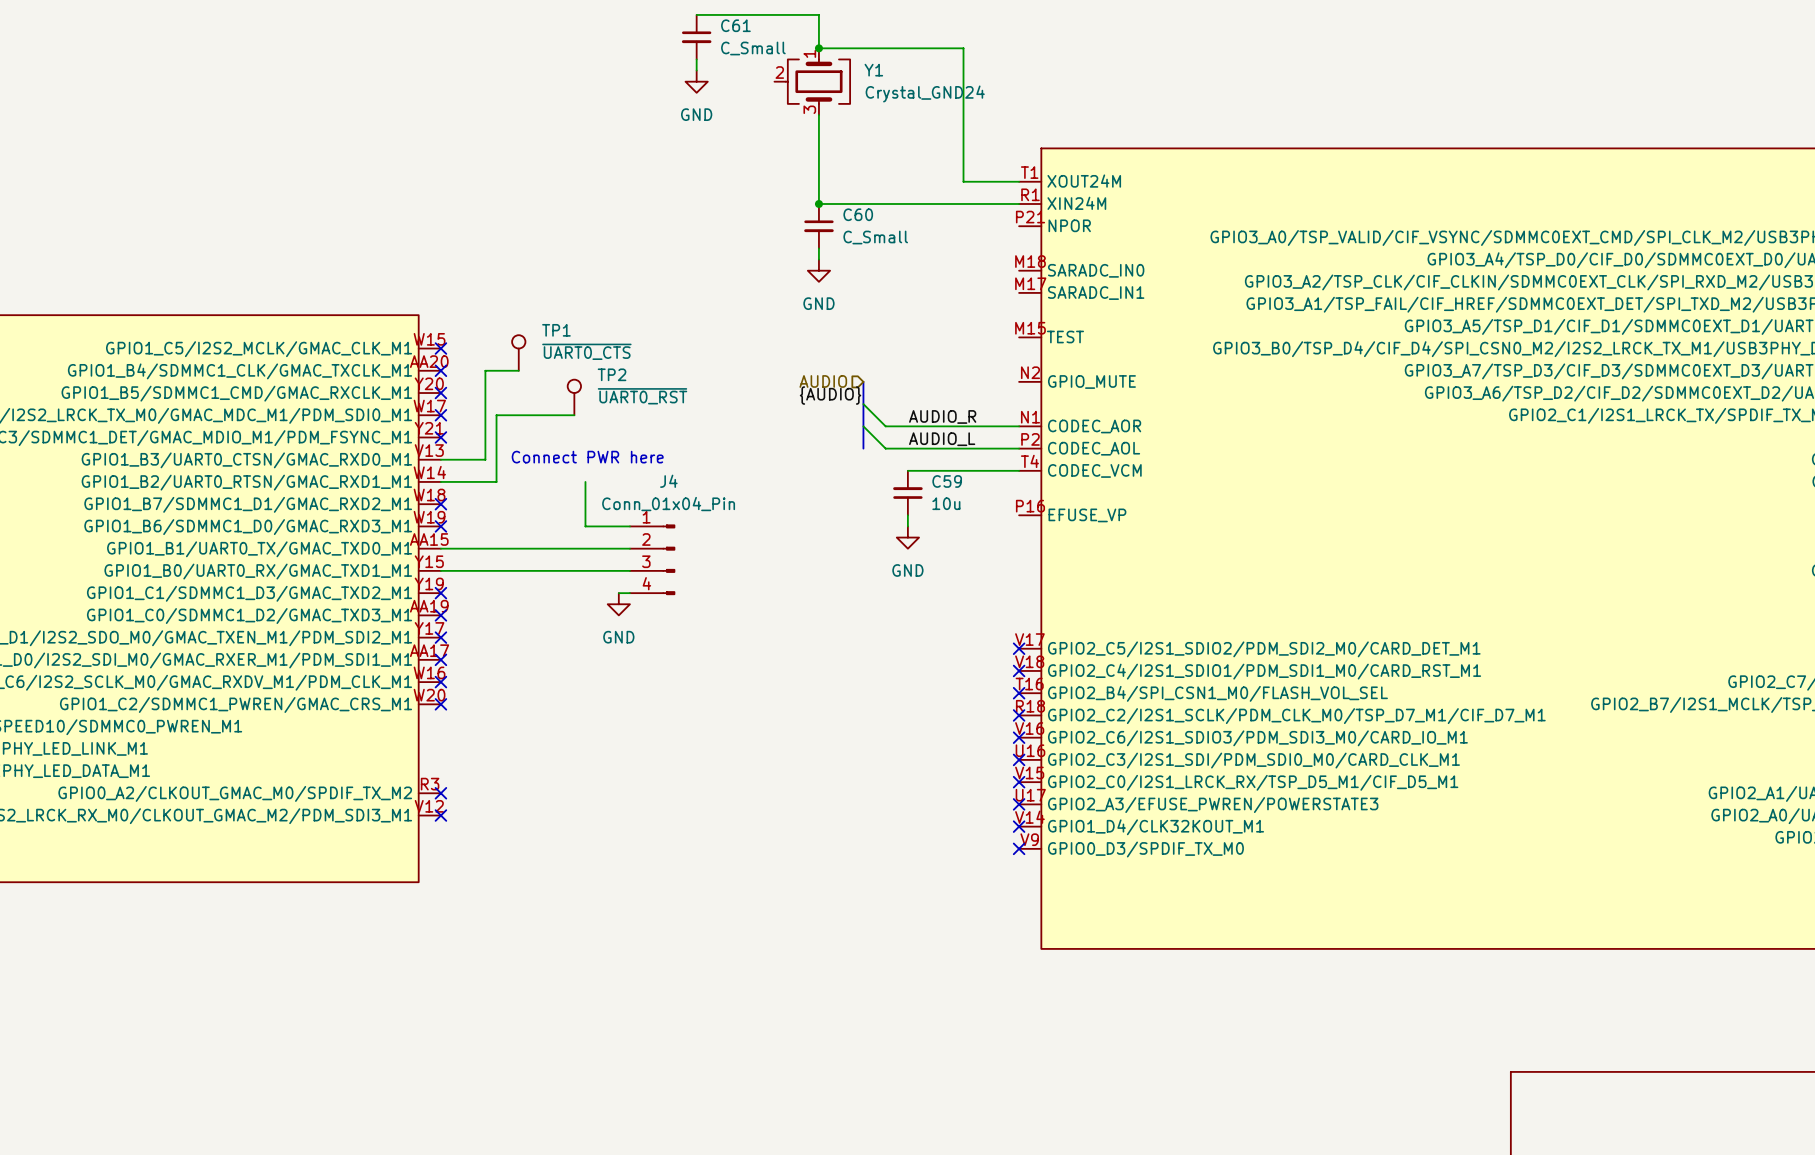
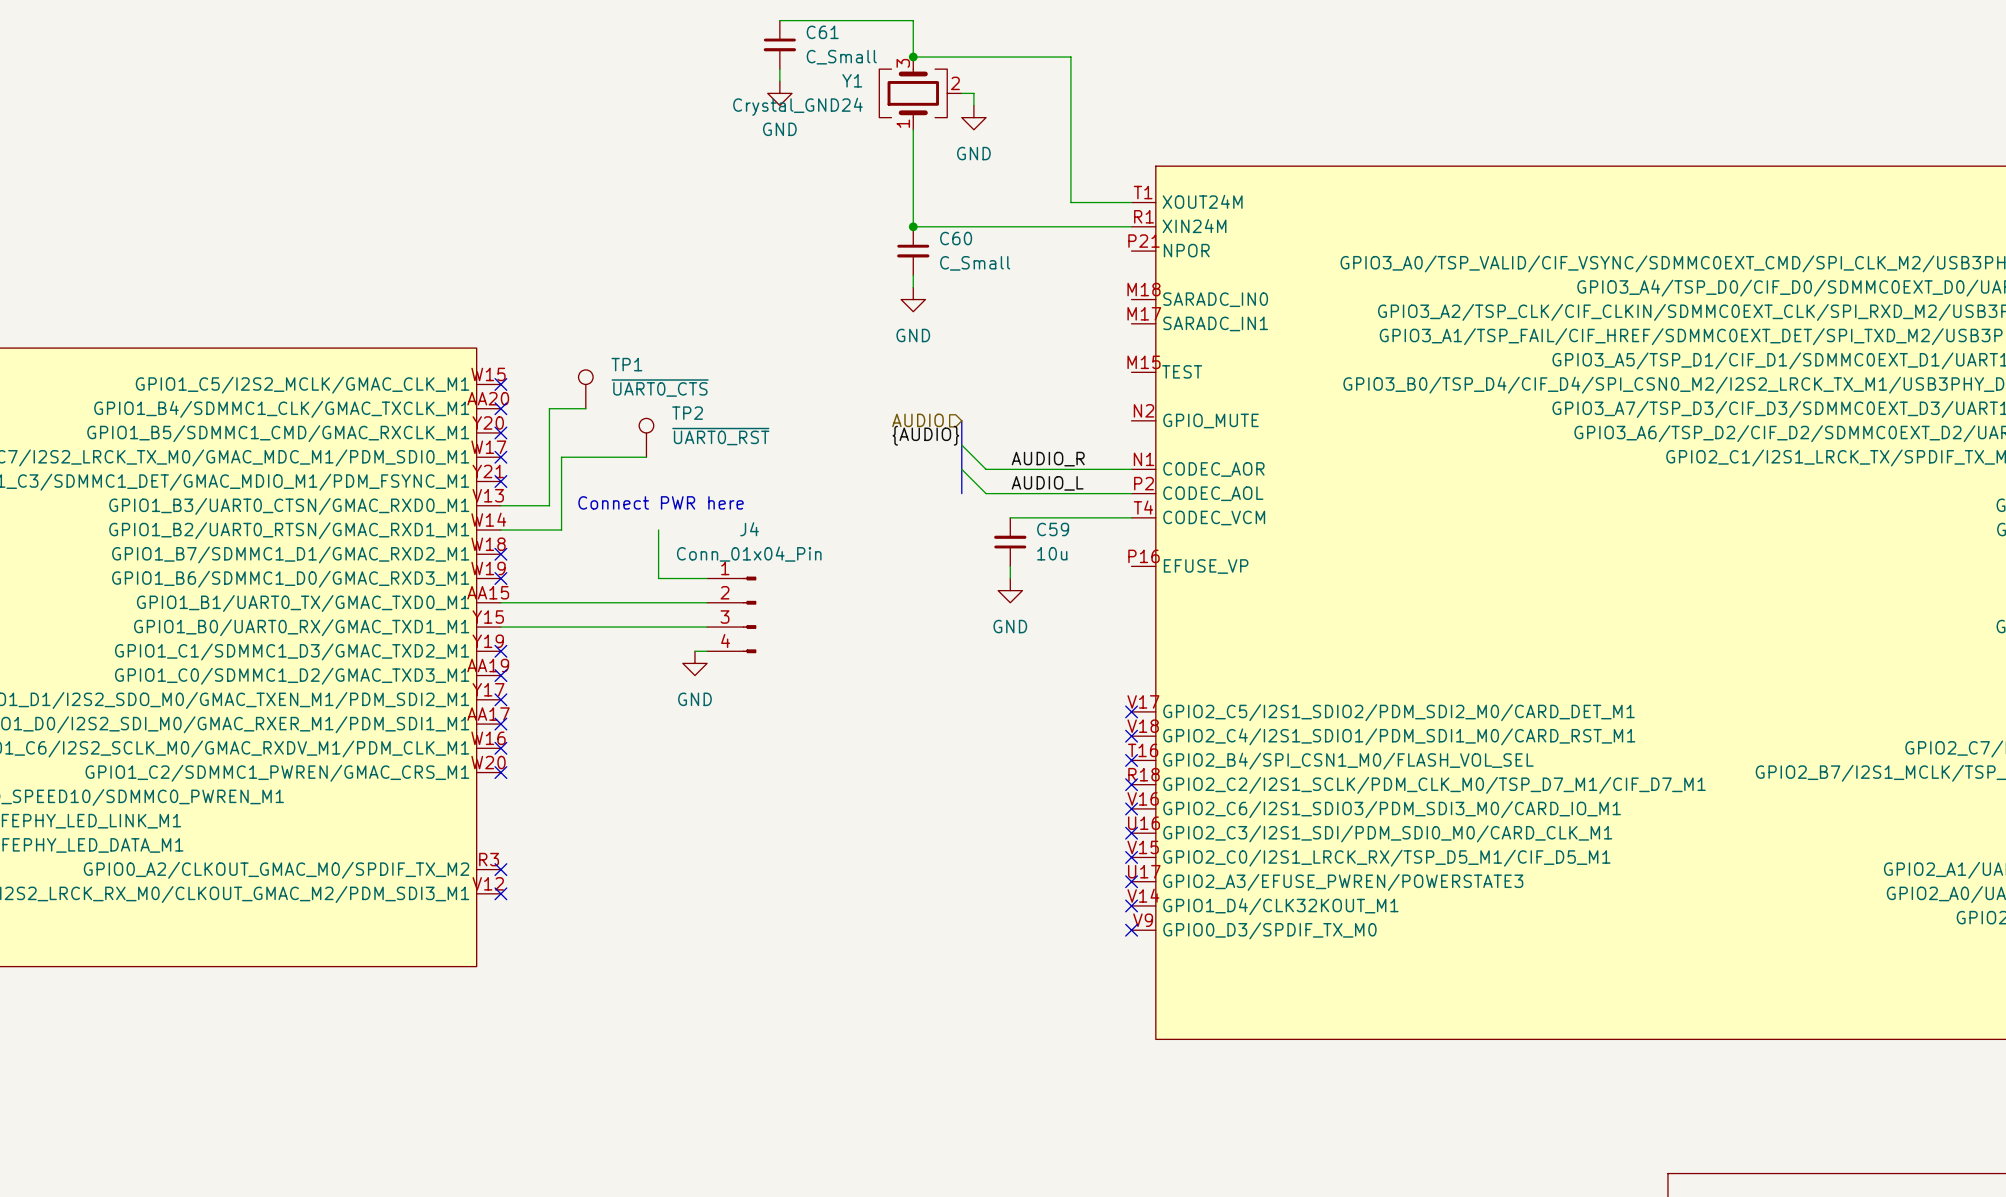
Y1 name position: Y1 (873, 70) -> Y1 (852, 80)
Y1 rotation: 0° (817, 81) -> 180° (914, 93)
wire: none -> (961, 93) (973, 93) (973, 105)
Y1 value position: Crystal_GND24 (925, 93) -> Crystal_GND24 (797, 106)
power symbol: none -> GND (973, 117)

